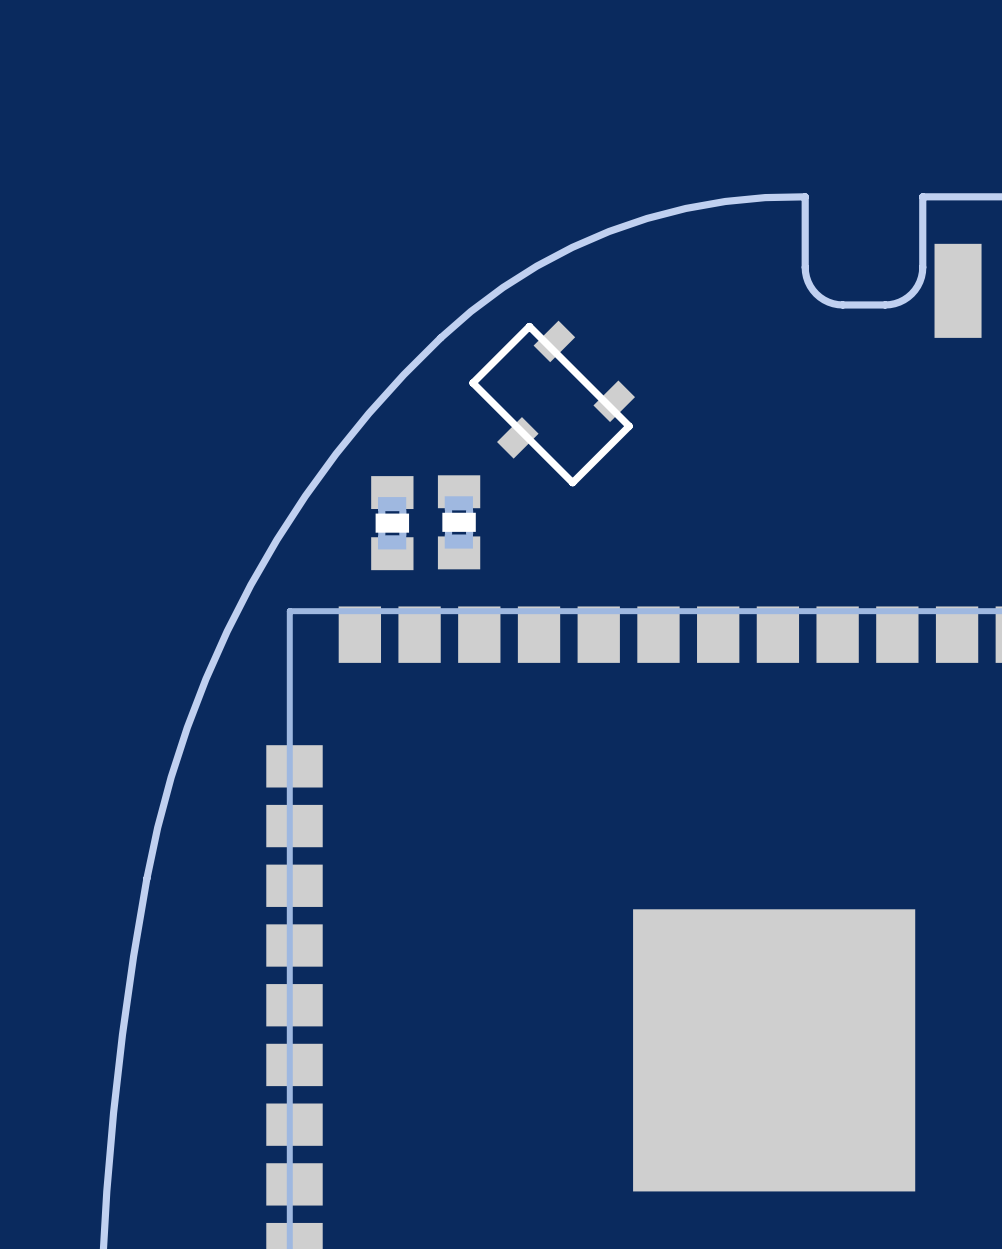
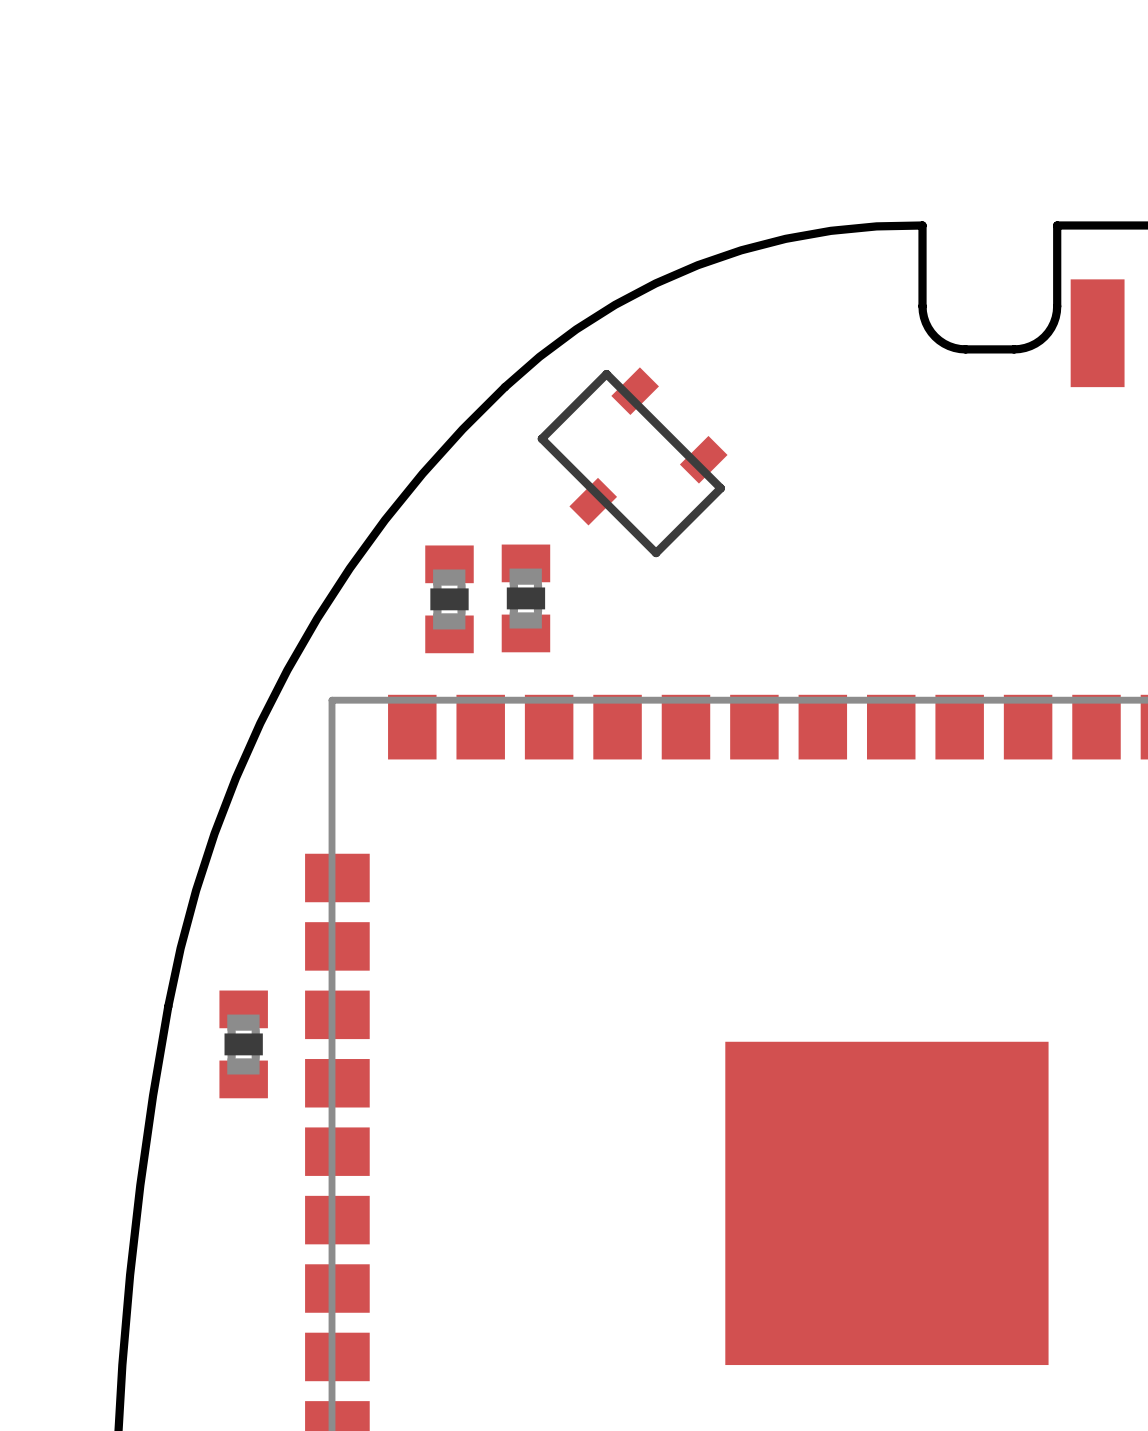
part: none -> (243, 1044)

